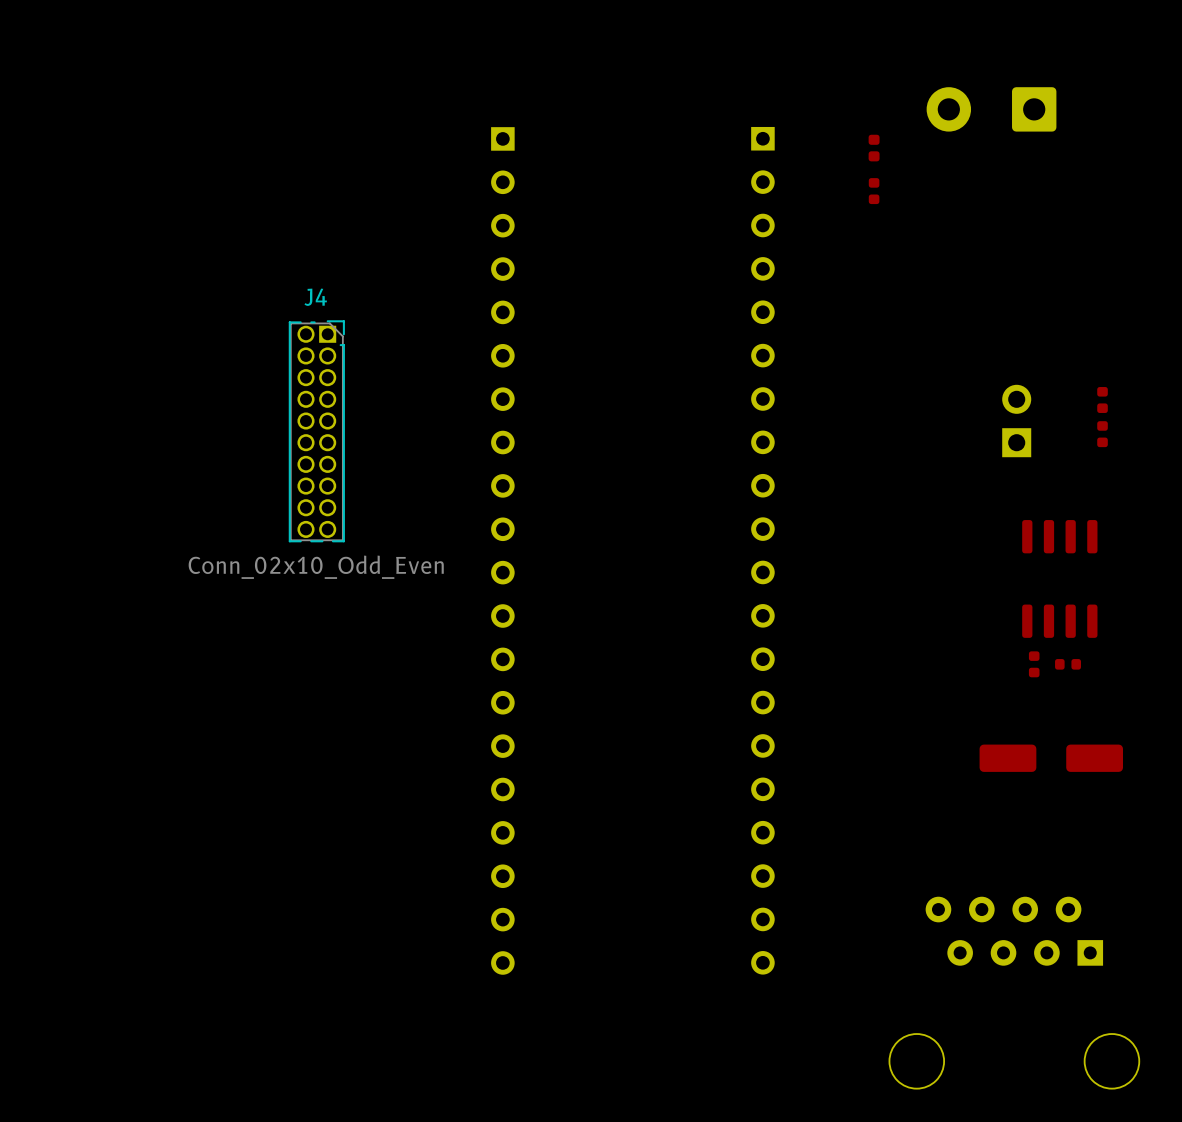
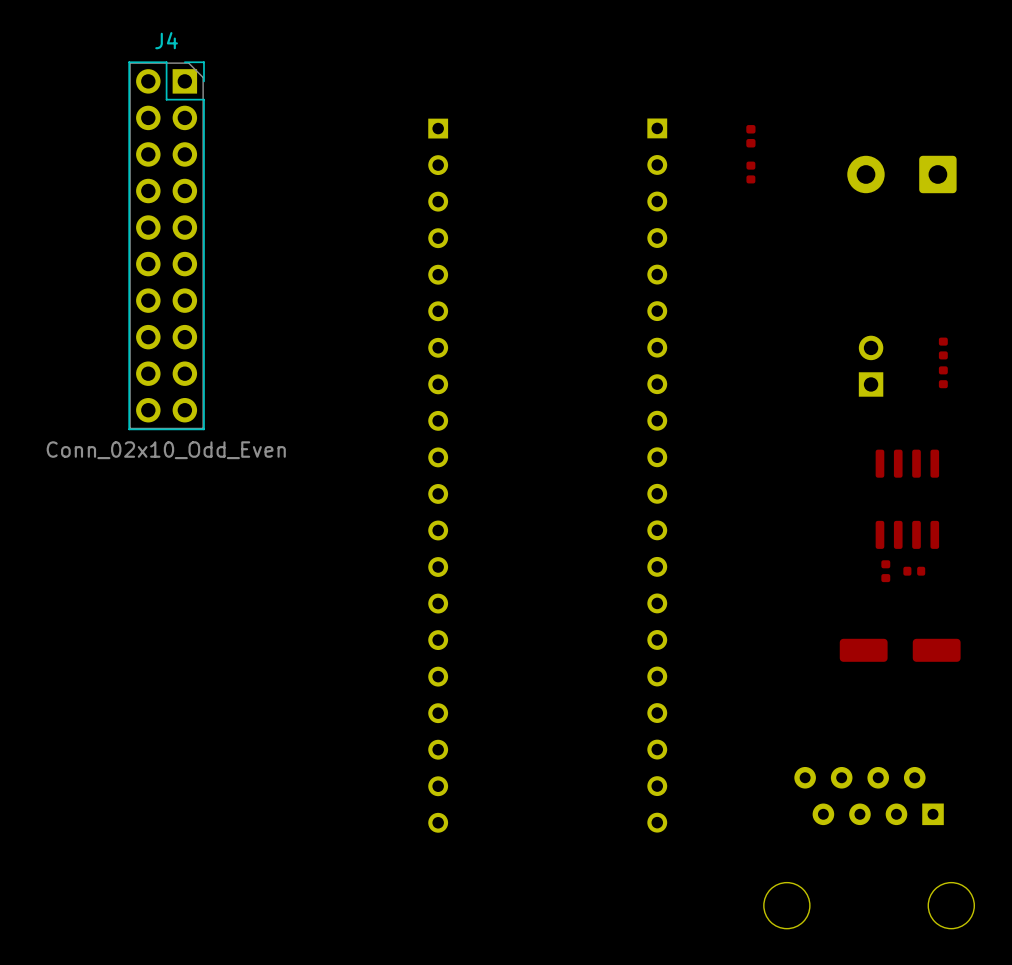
part position: (991, 109) -> (901, 174)
J4 name position: J4 (315, 297) -> J4 (166, 40)
J4 footprint: [288, 320, 345, 543] -> [128, 61, 205, 431]
J4 value position: Conn_02x10_Odd_Even (316, 567) -> Conn_02x10_Odd_Even (166, 450)

